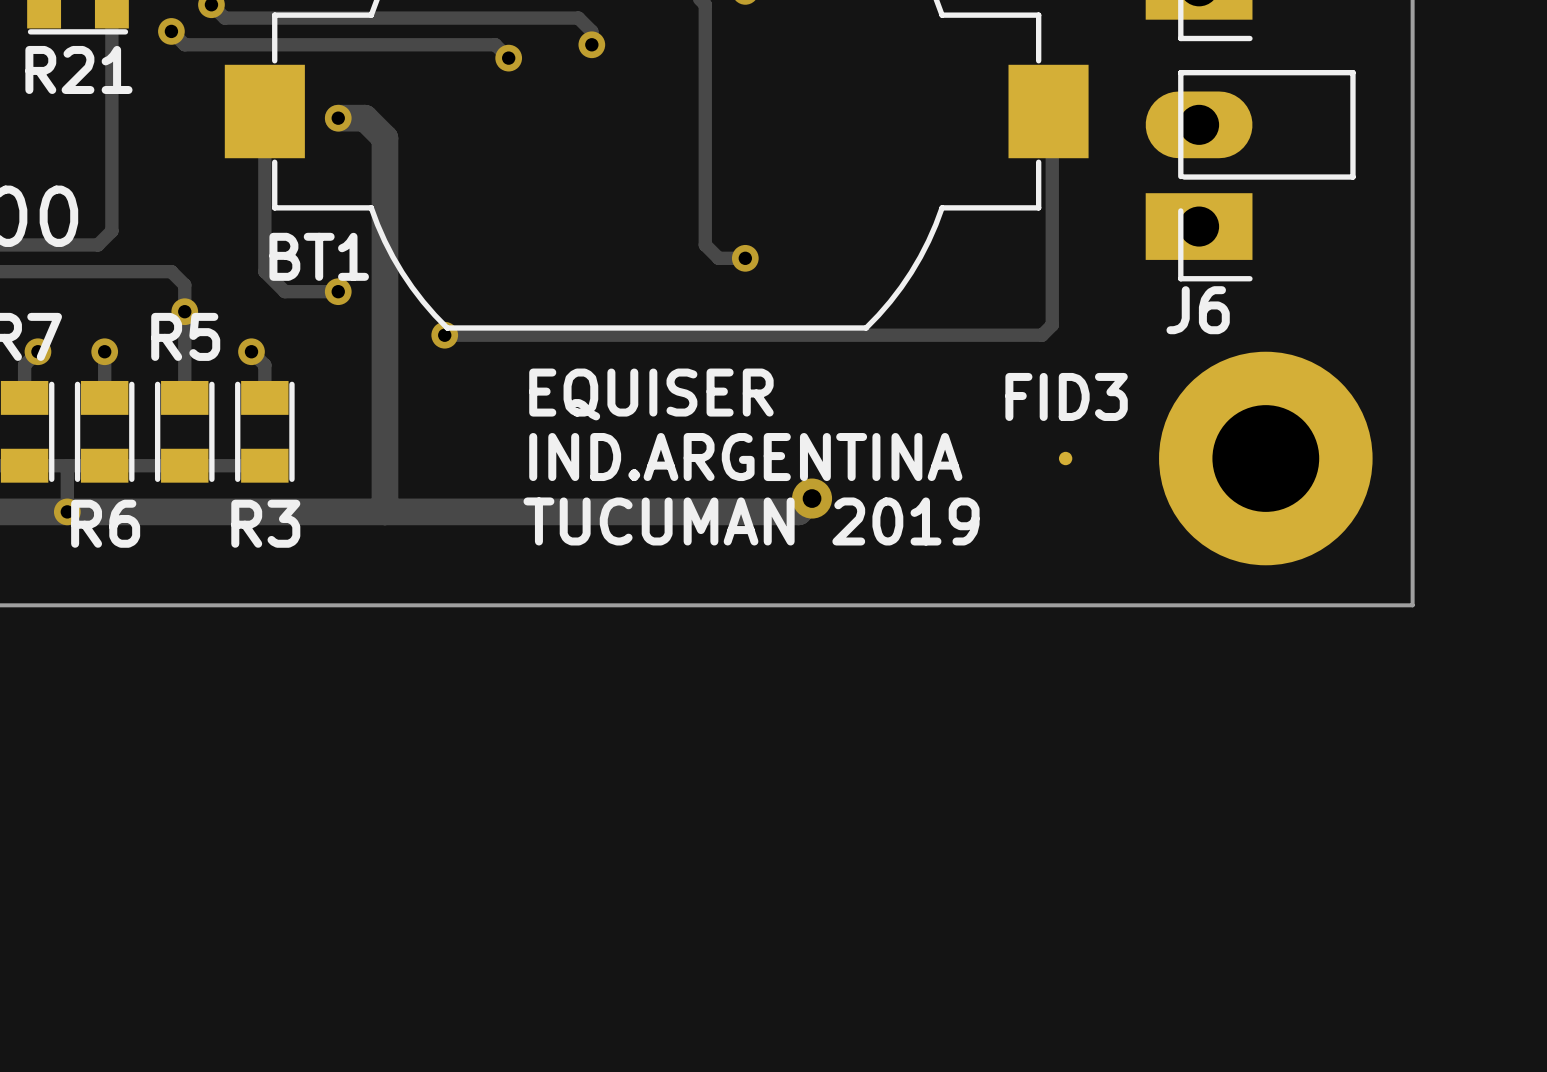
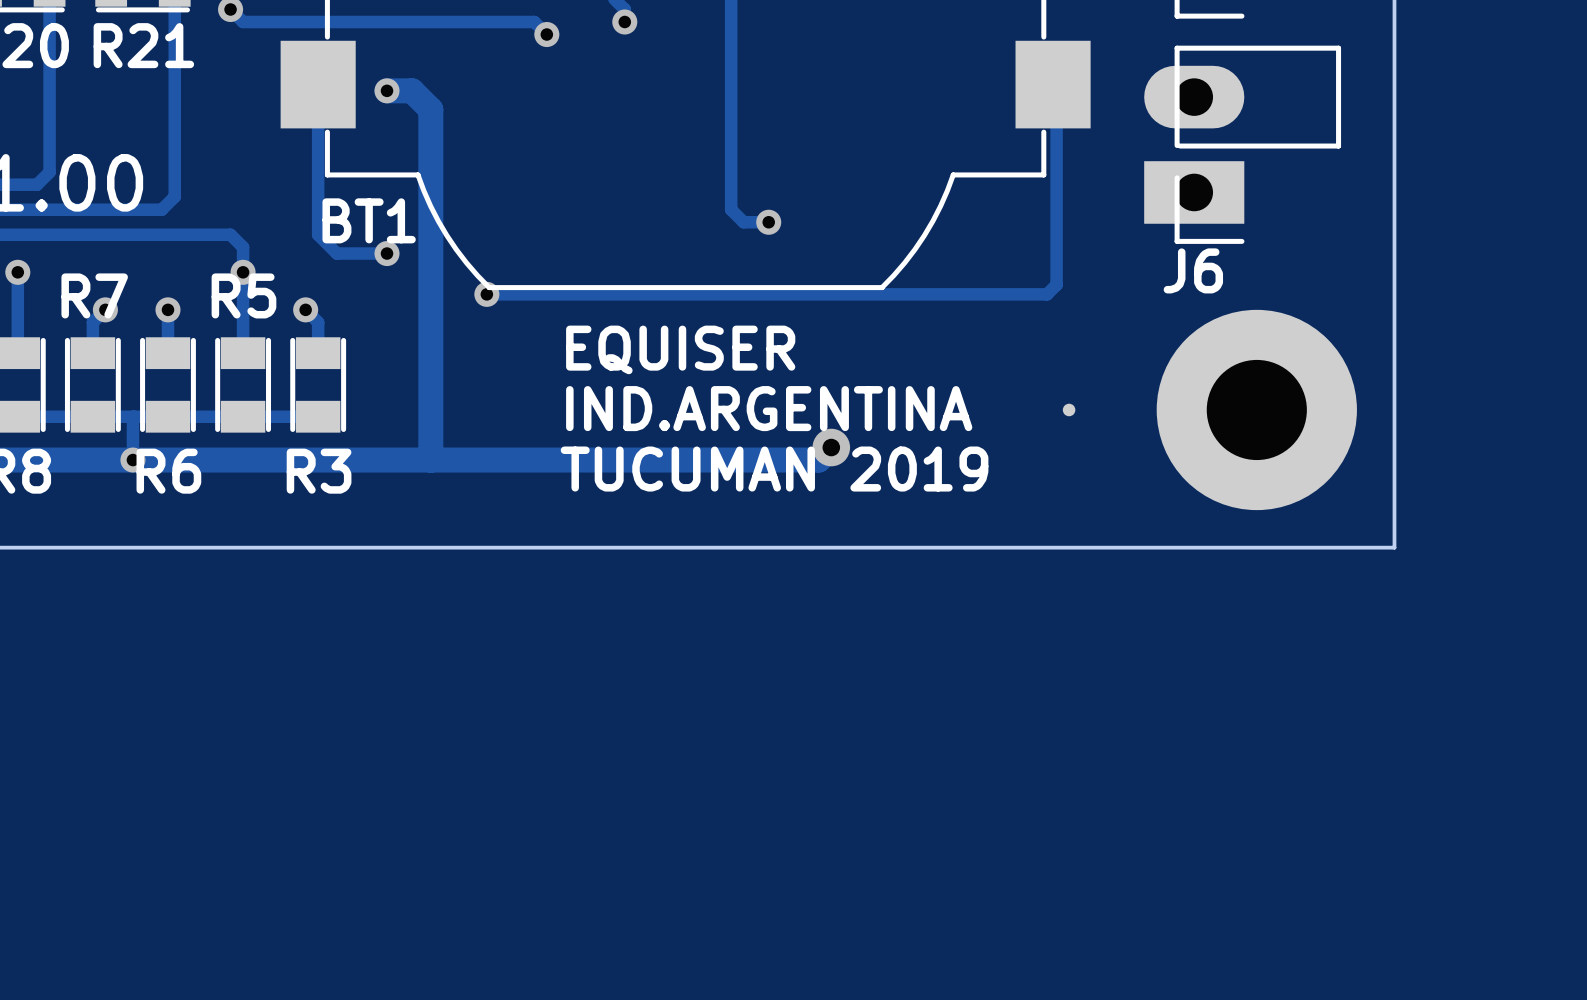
FID3 name: FID3 (1066, 396) -> none

